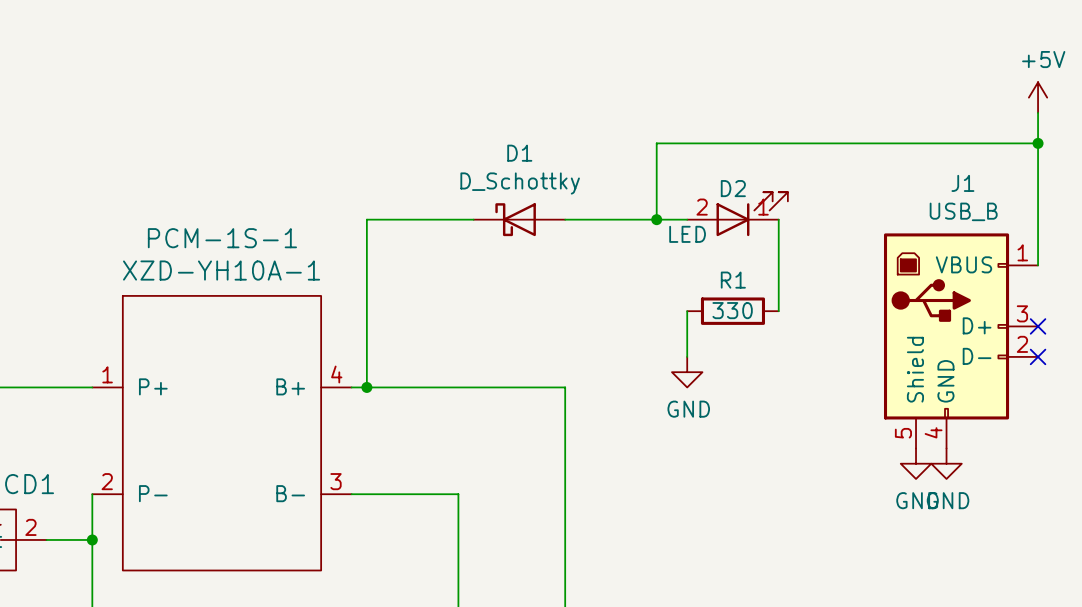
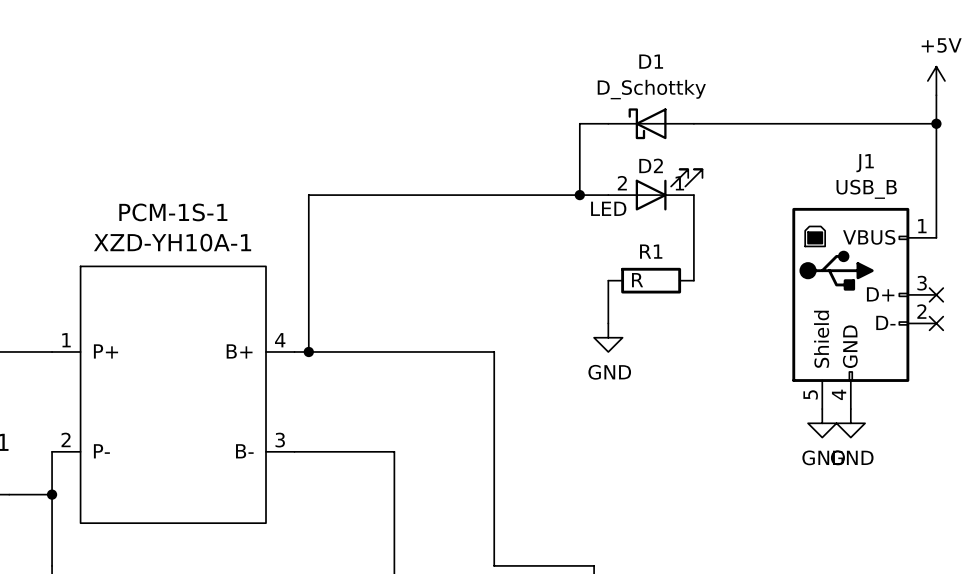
D1 position: (519, 219) -> (651, 123)
R1 value: 330 (732, 310) -> R (637, 280)

